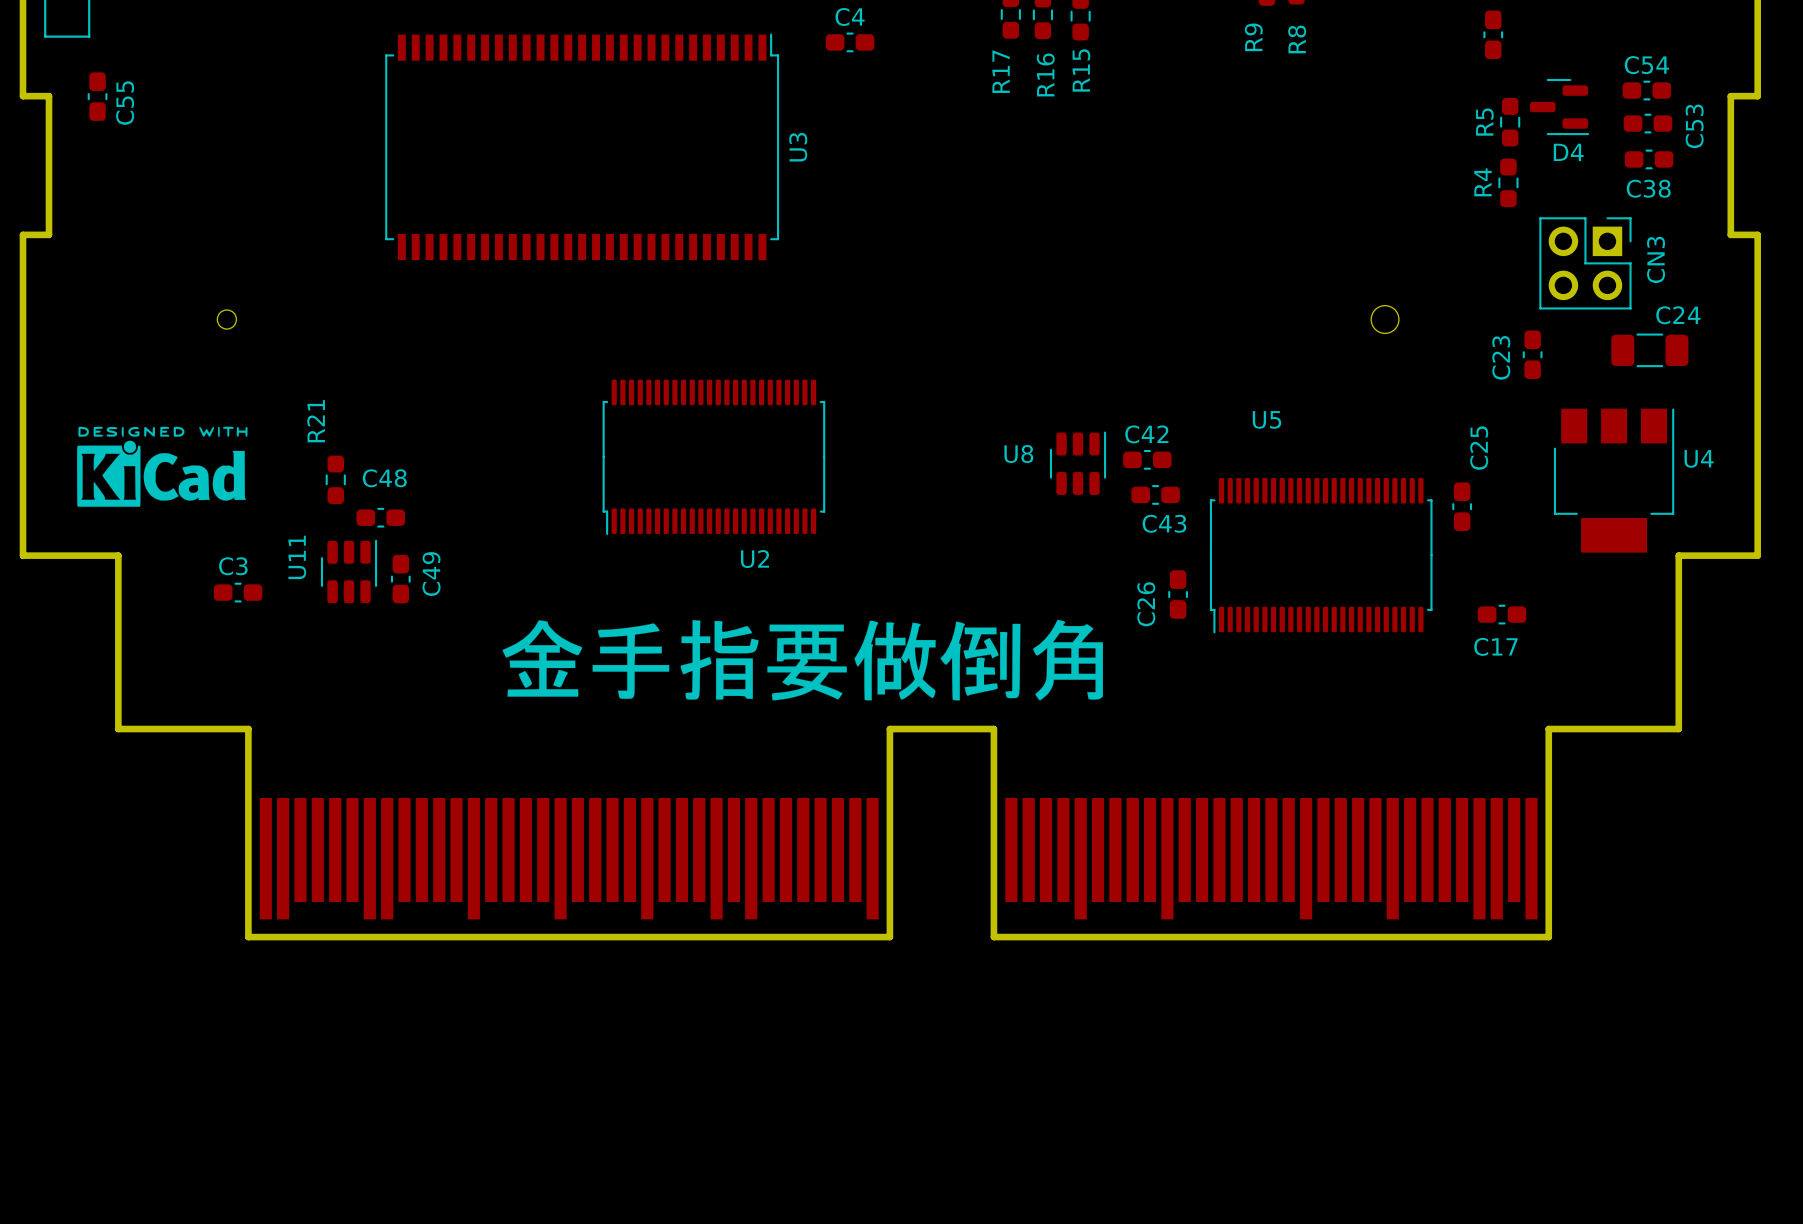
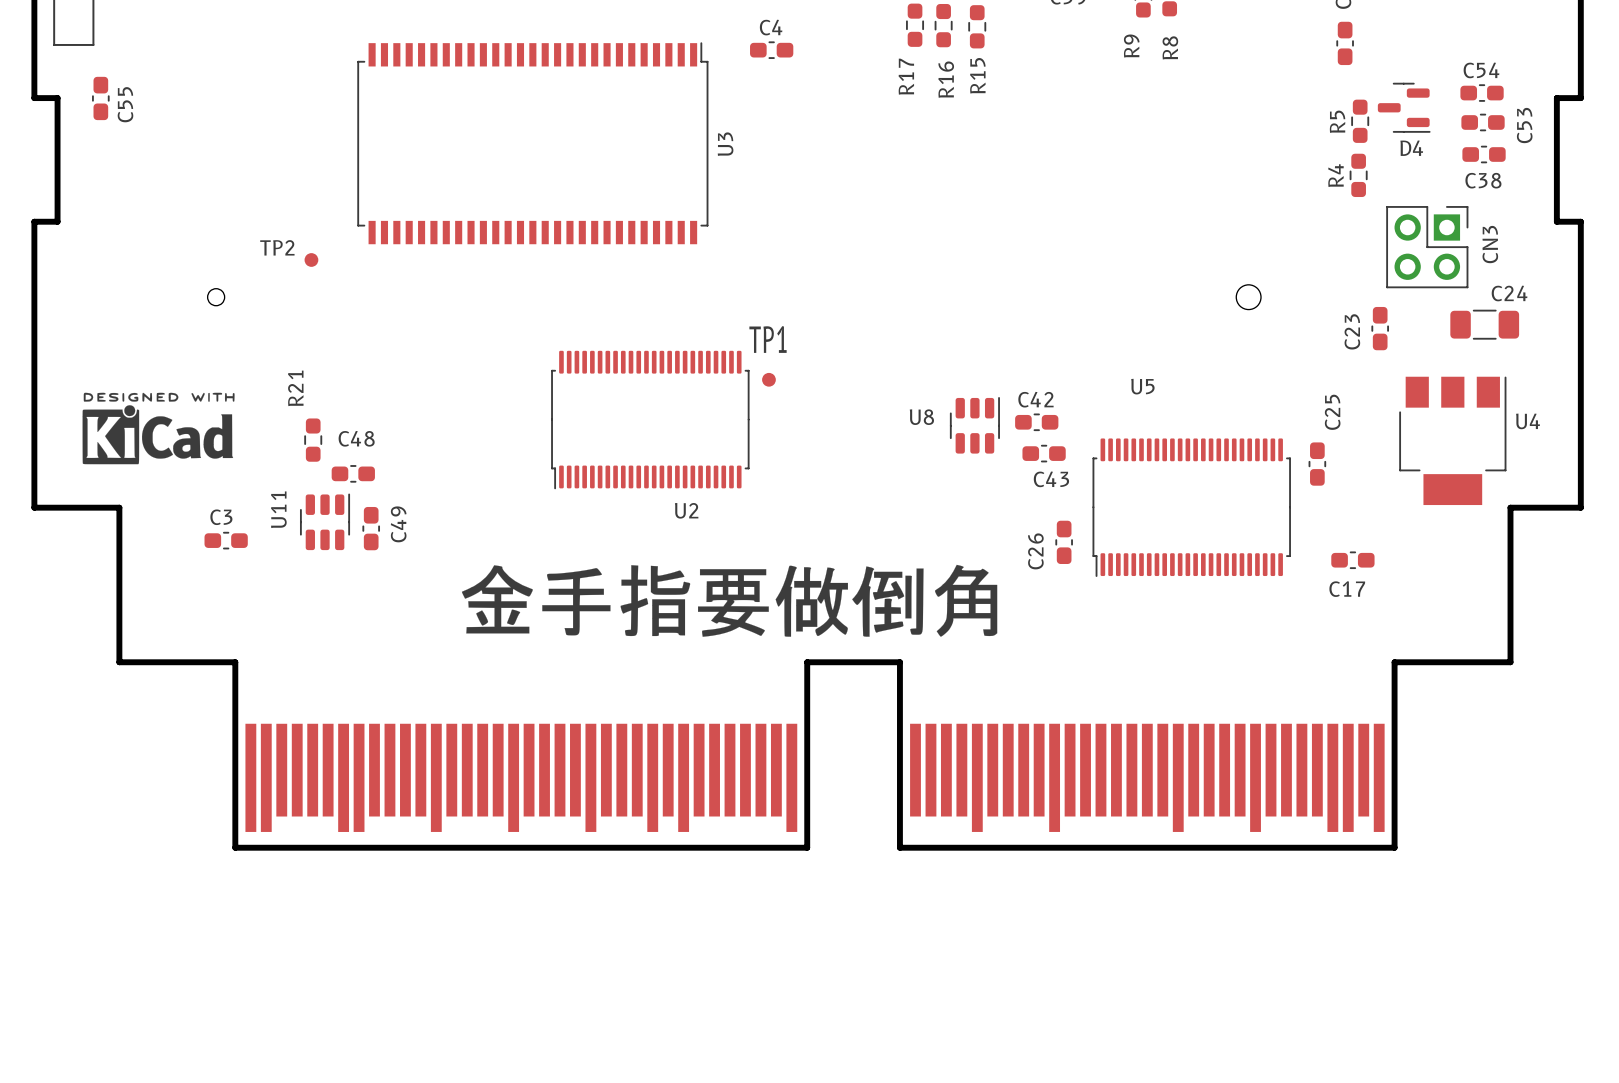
TP2: none -> (311, 259)
TP1: none -> (768, 379)

